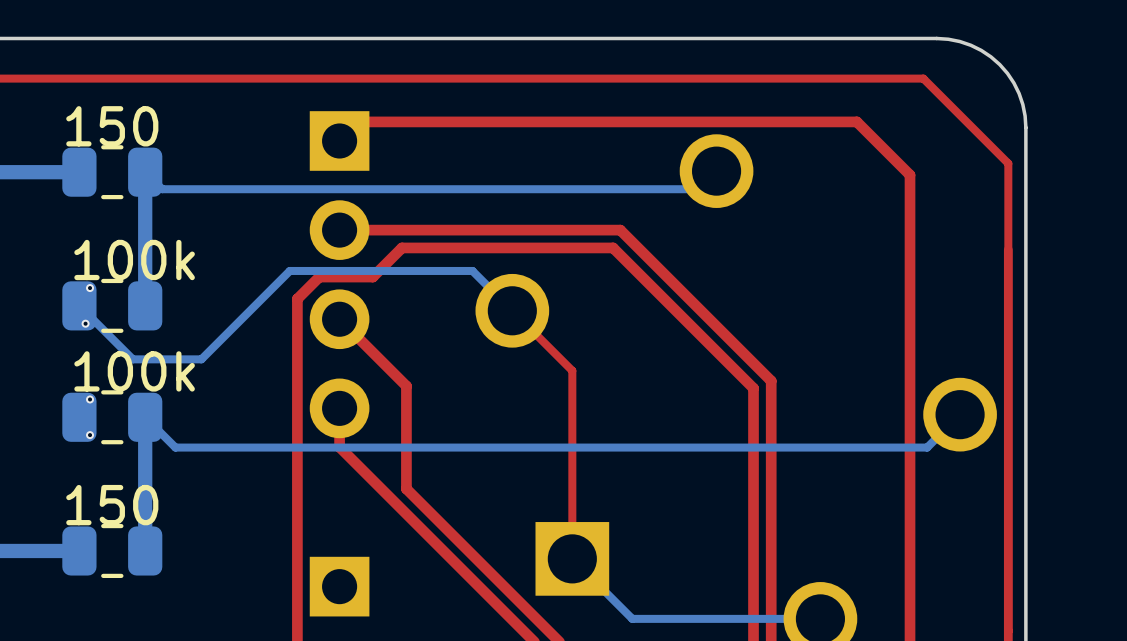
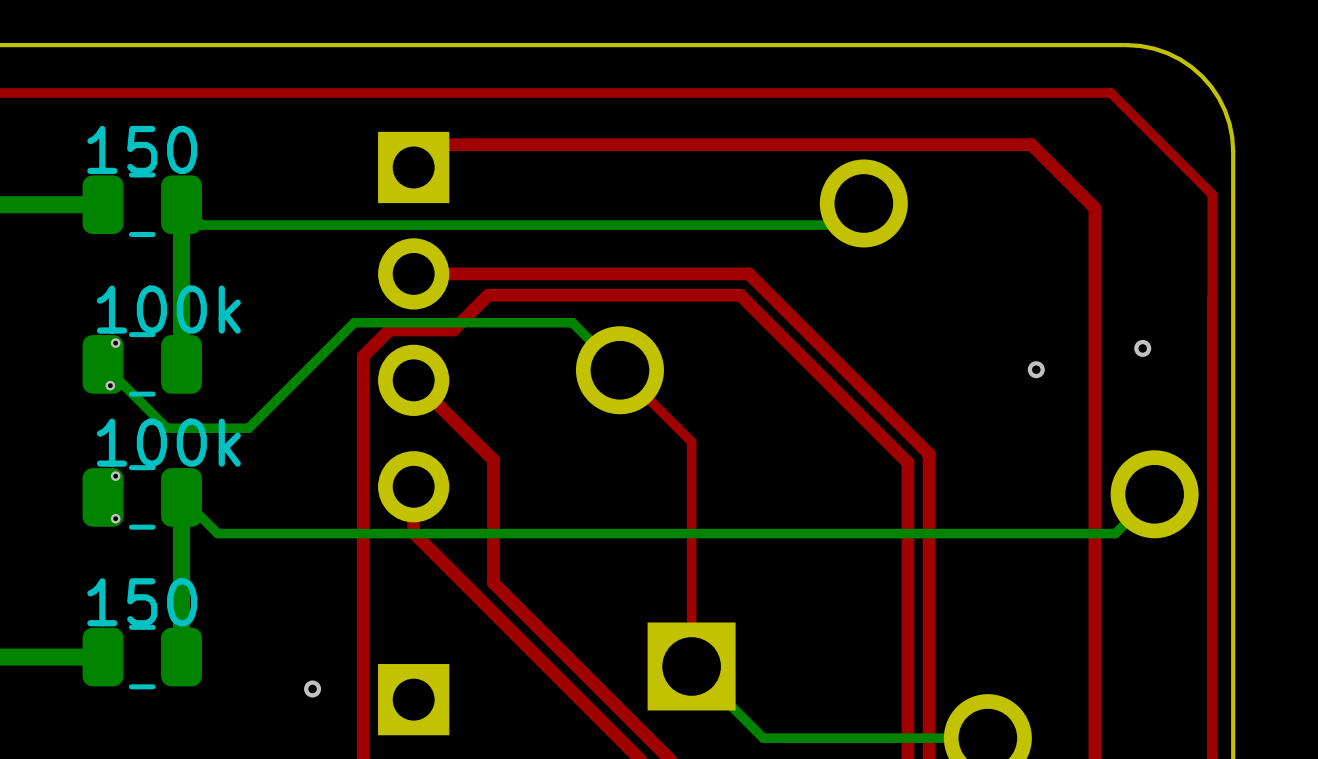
via: none -> (1142, 348)
via: none -> (1036, 369)
via: none -> (312, 688)

